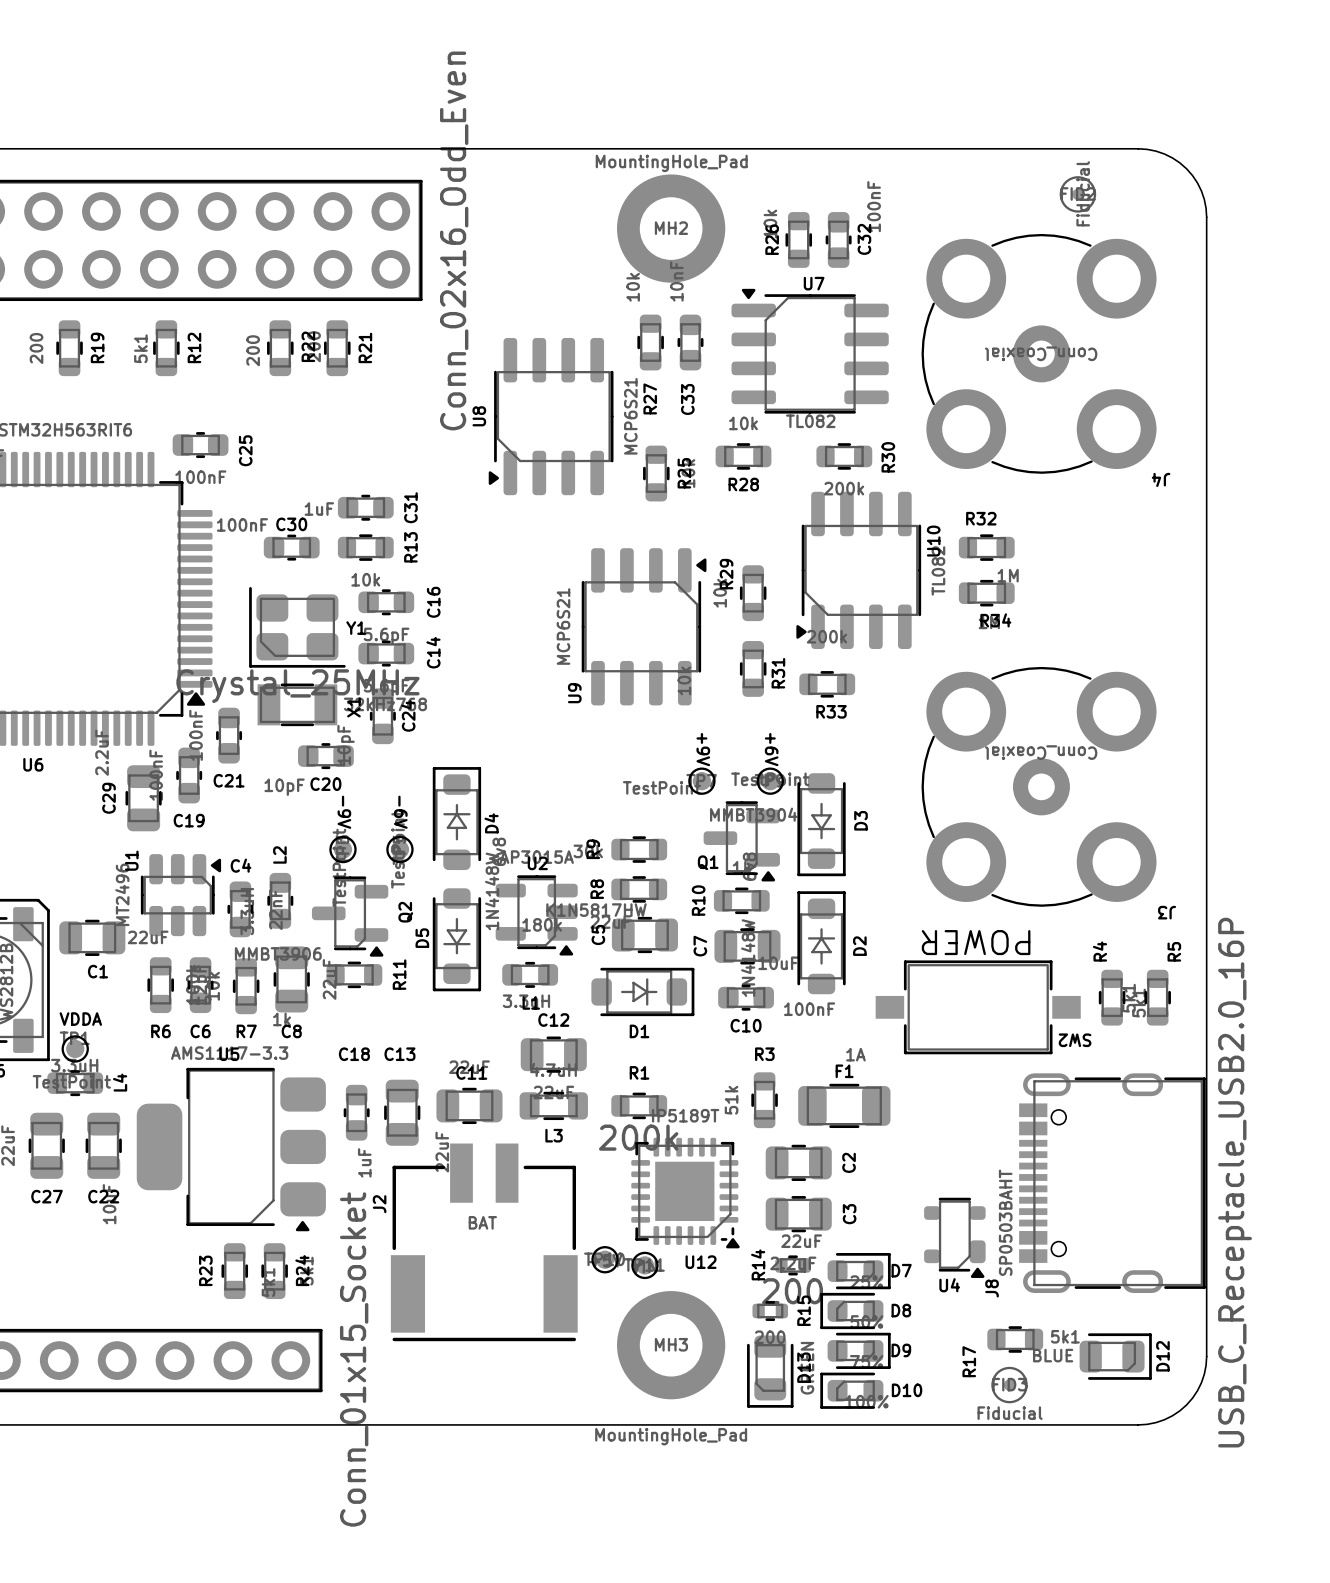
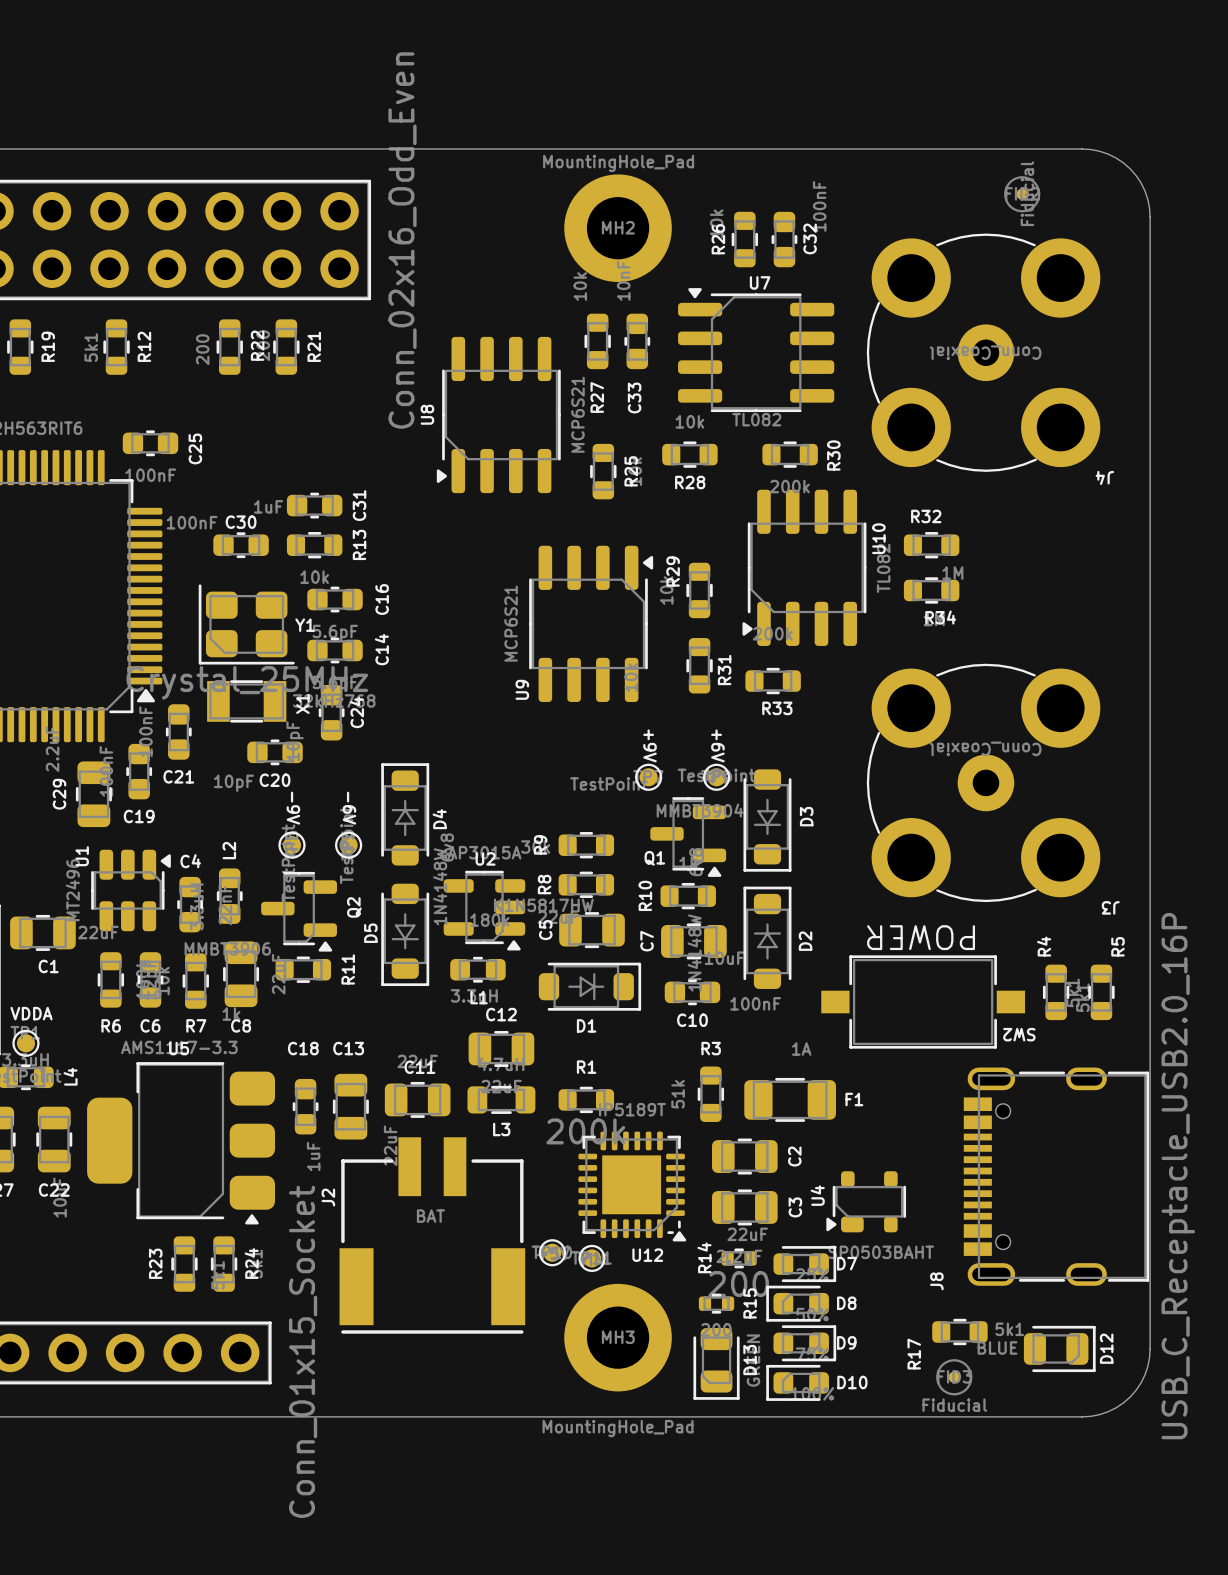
F1 name position: F1 (844, 1071) -> F1 (854, 1099)
U4 rotation: 0° (954, 1237) -> 90° clockwise (866, 1201)

